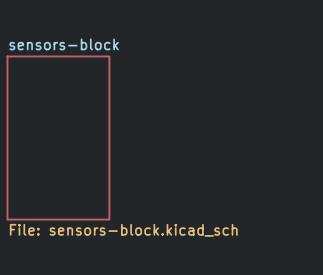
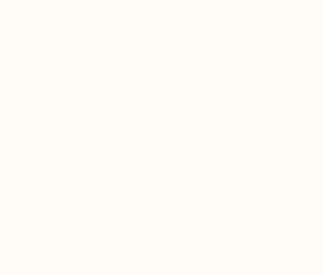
sheet sensors-block: File: sensors-block.kicad_sch (58, 138) -> none

